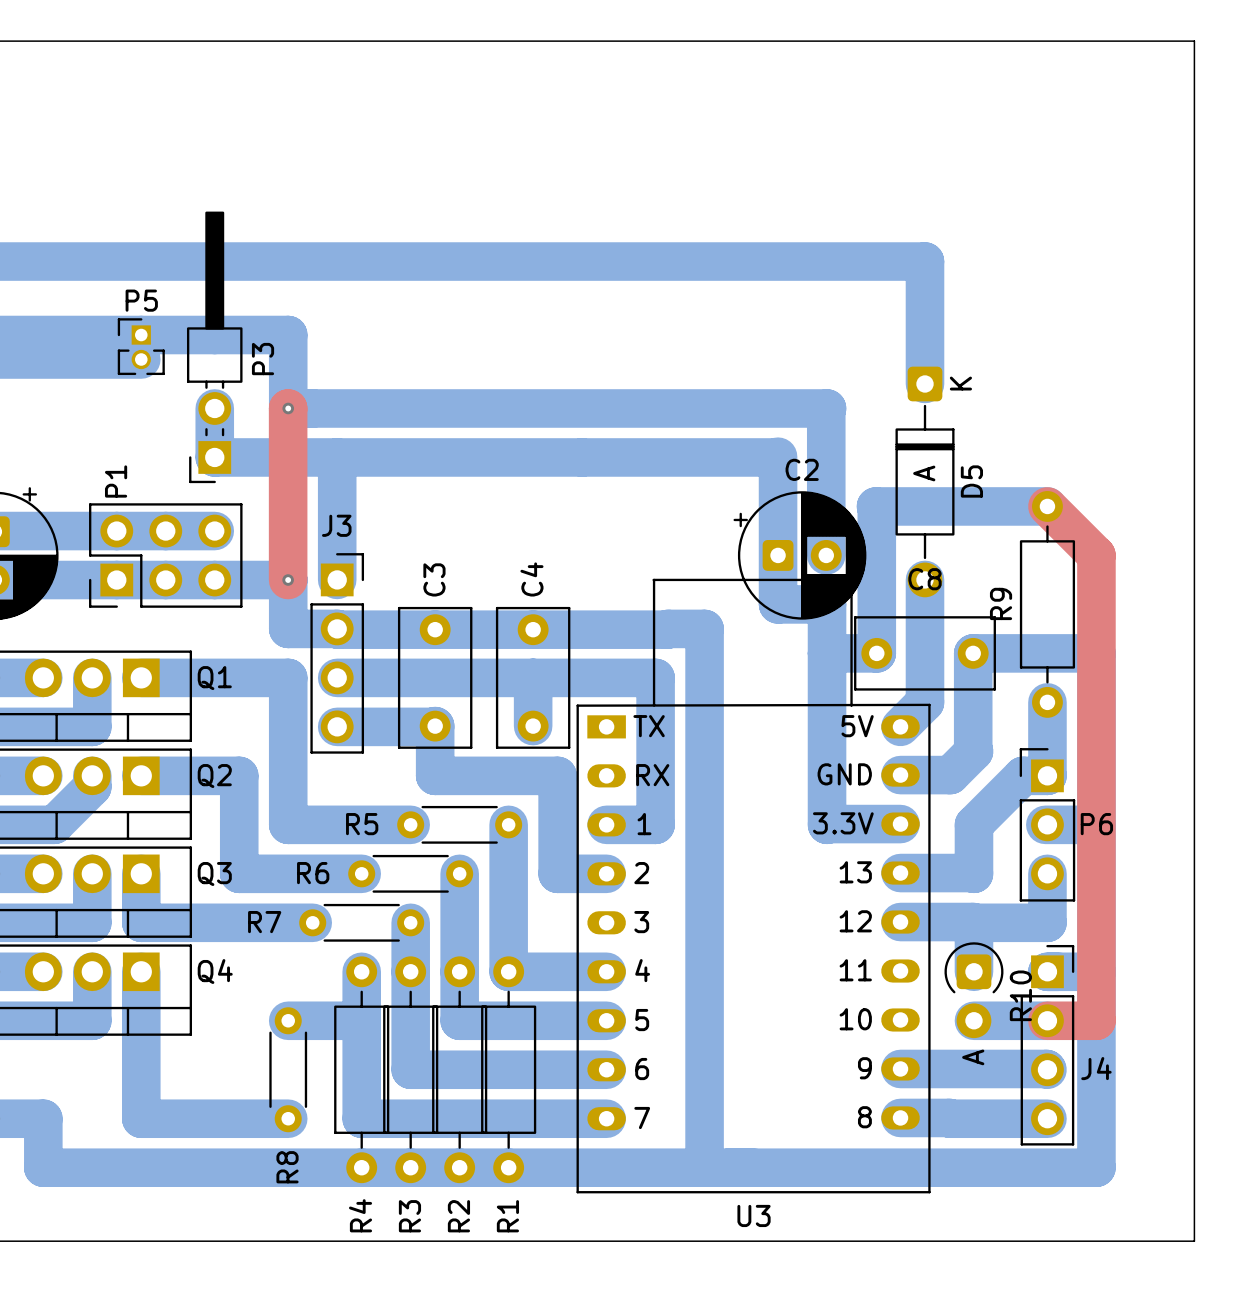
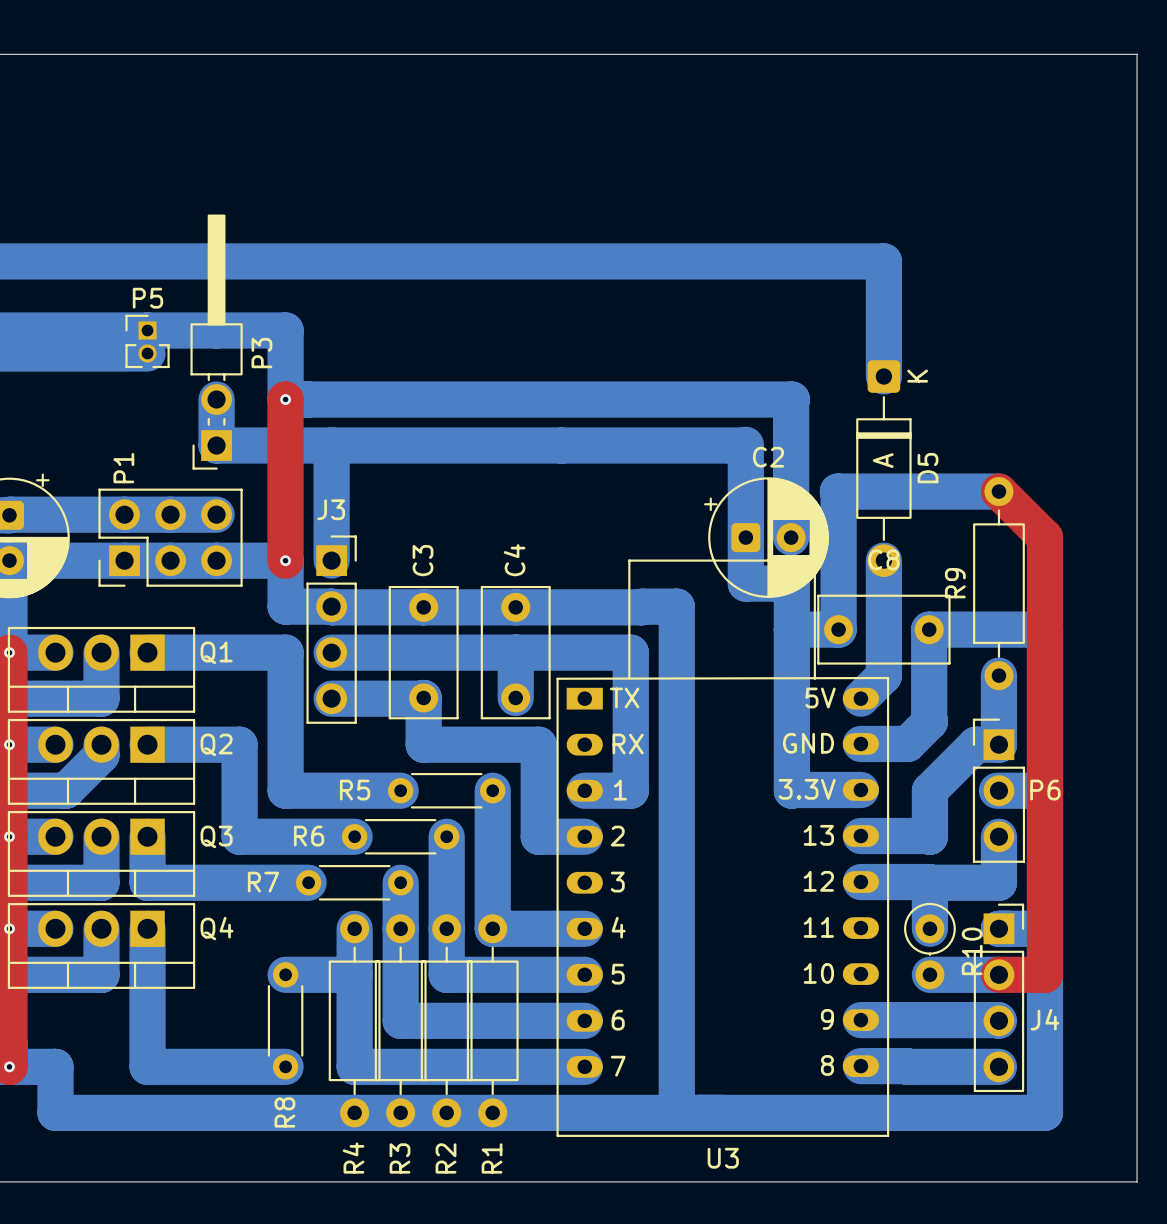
R10 footprint: [944, 942, 1004, 1039] -> [904, 902, 956, 990]

